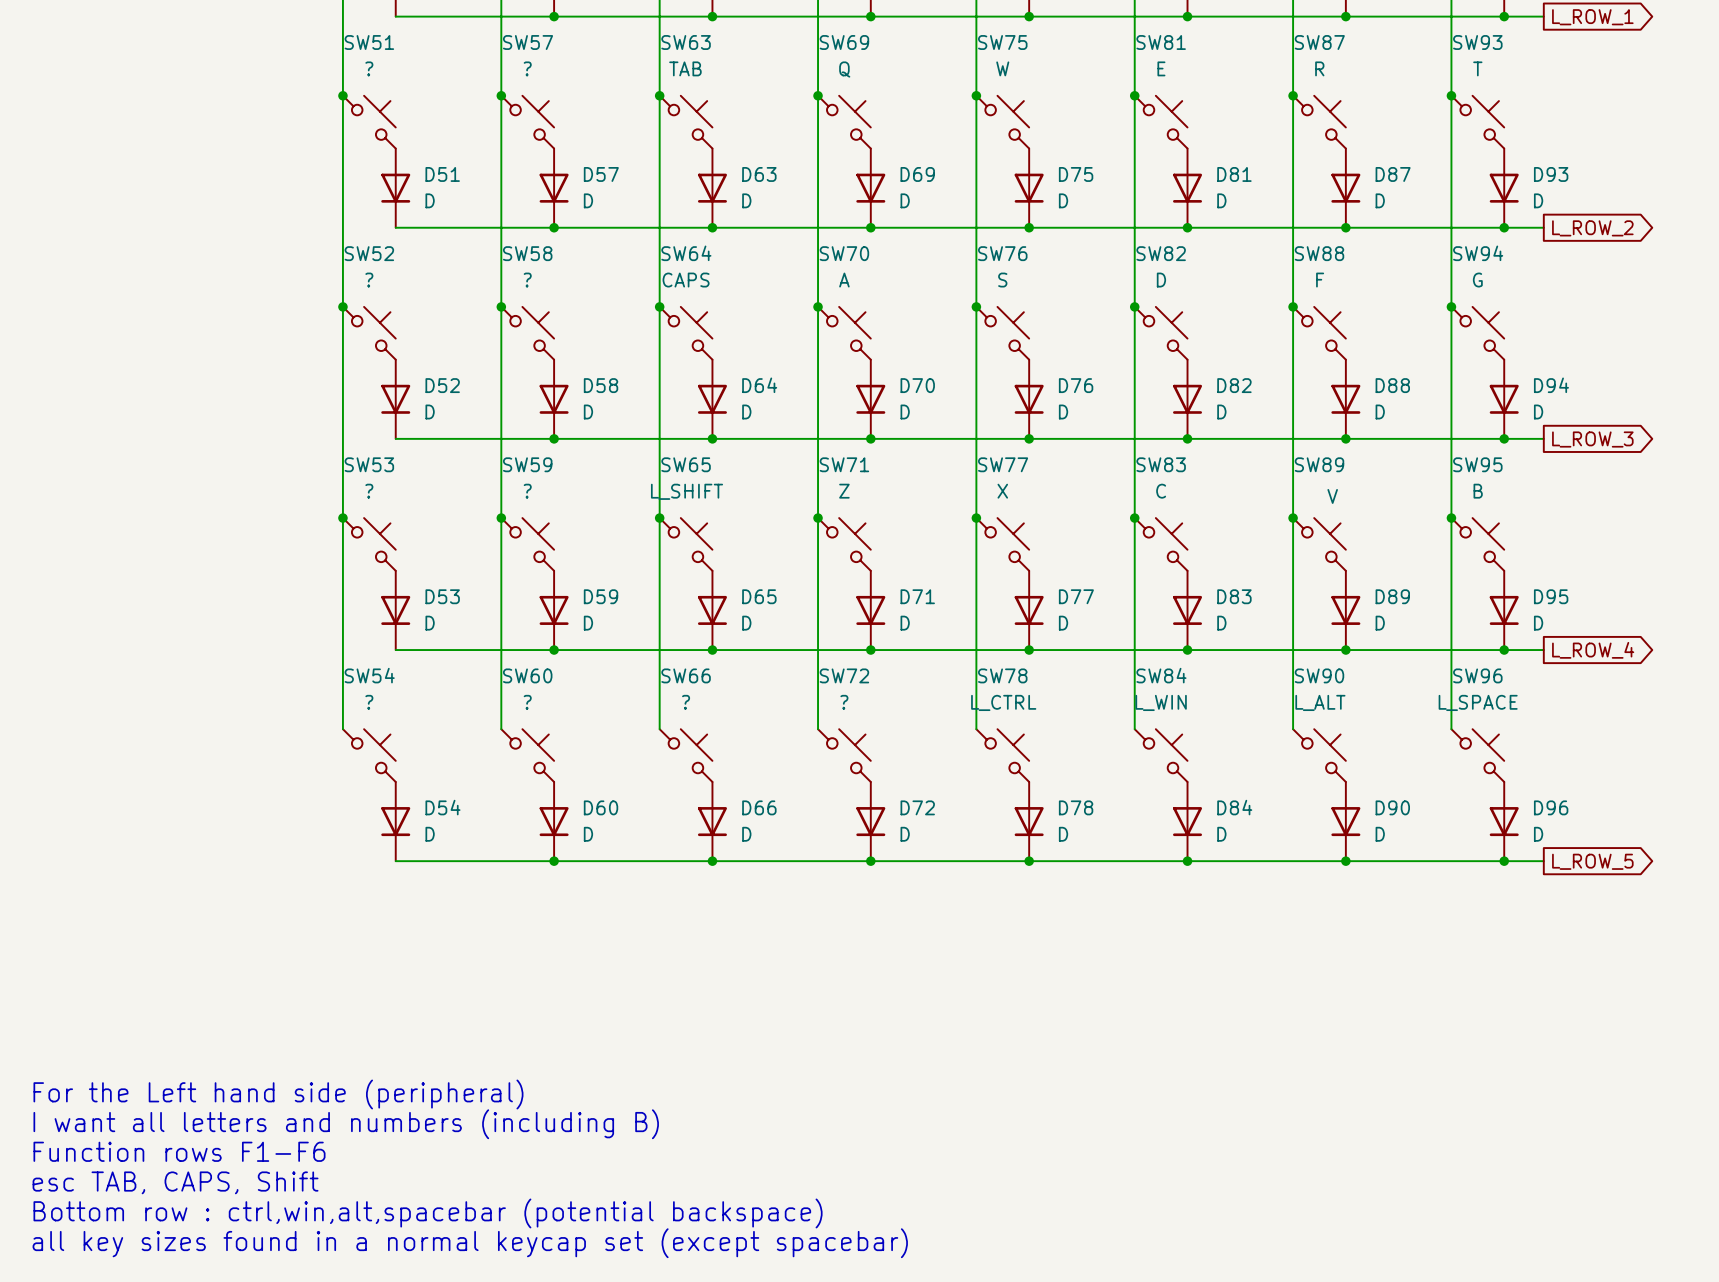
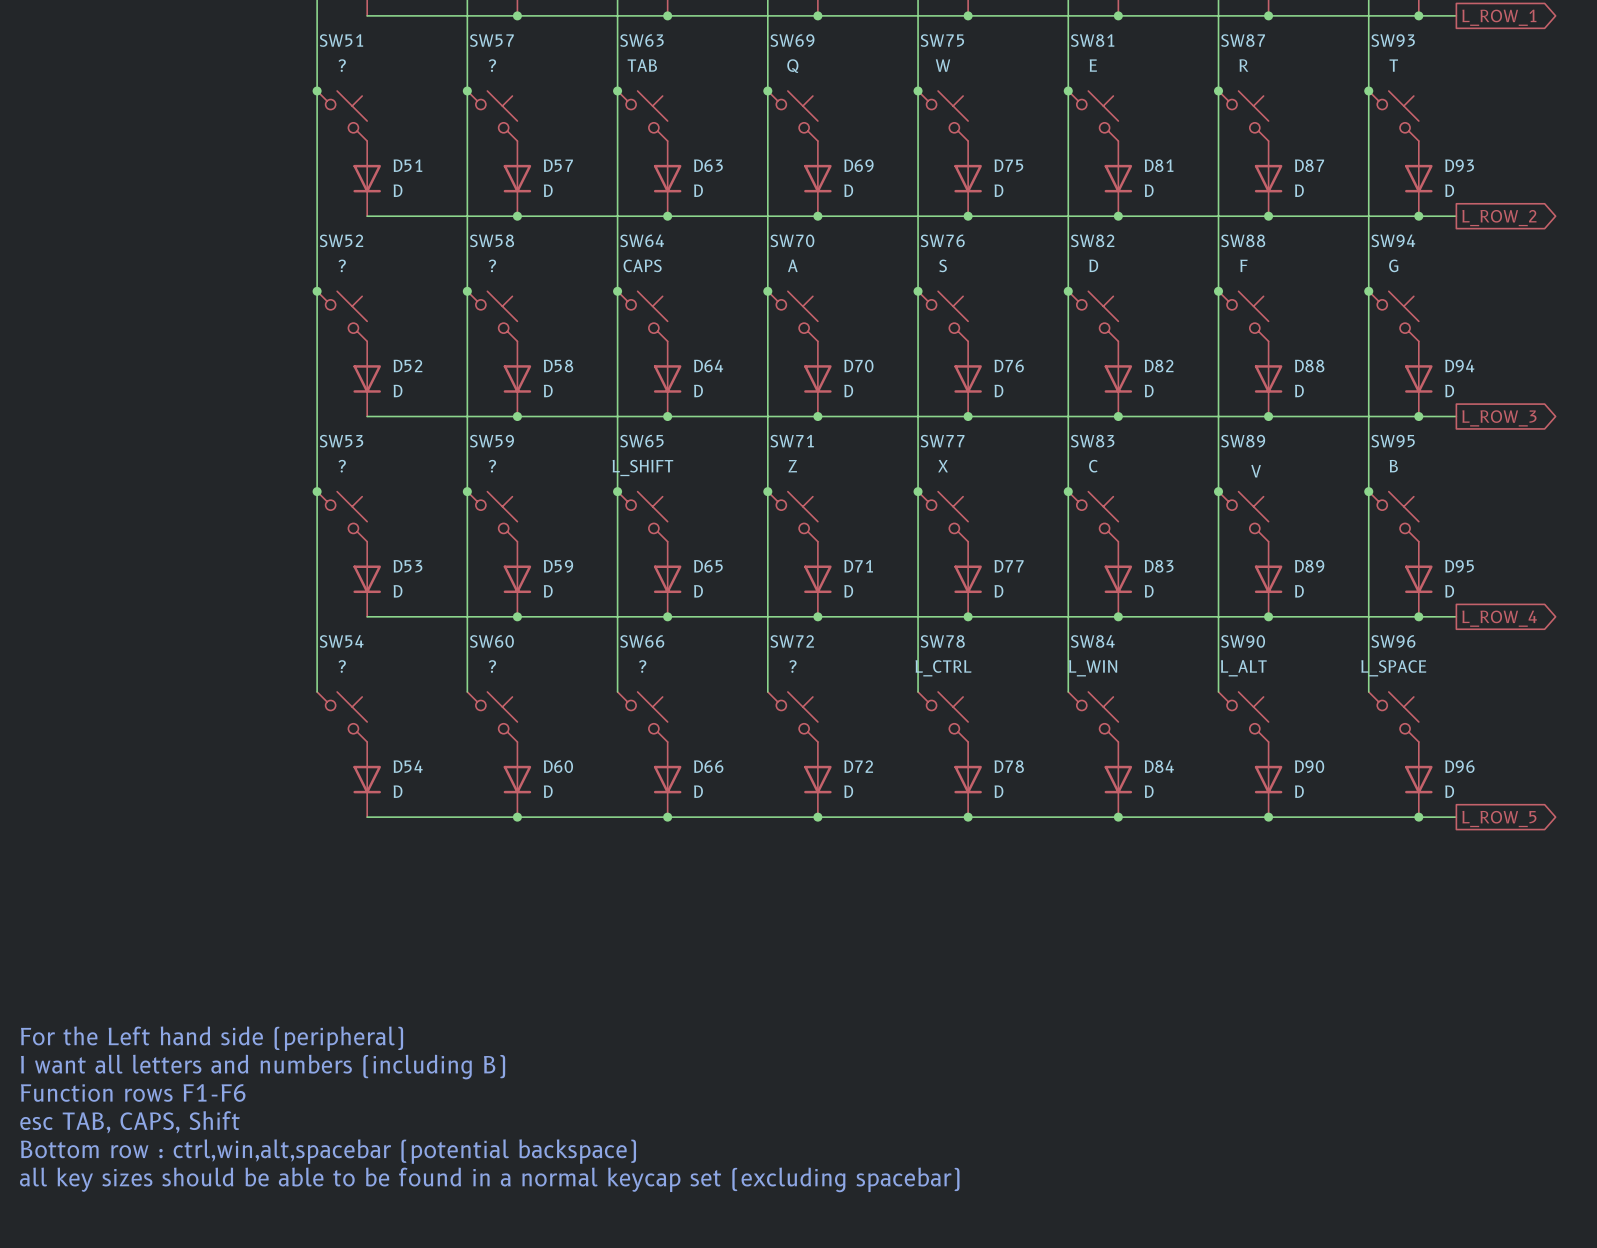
text: all key sizes found in a normal keycap set (except spacebar) (470, 1243) -> all key sizes should be able to be found in a normal keycap set (excluding spacebar) (489, 1179)

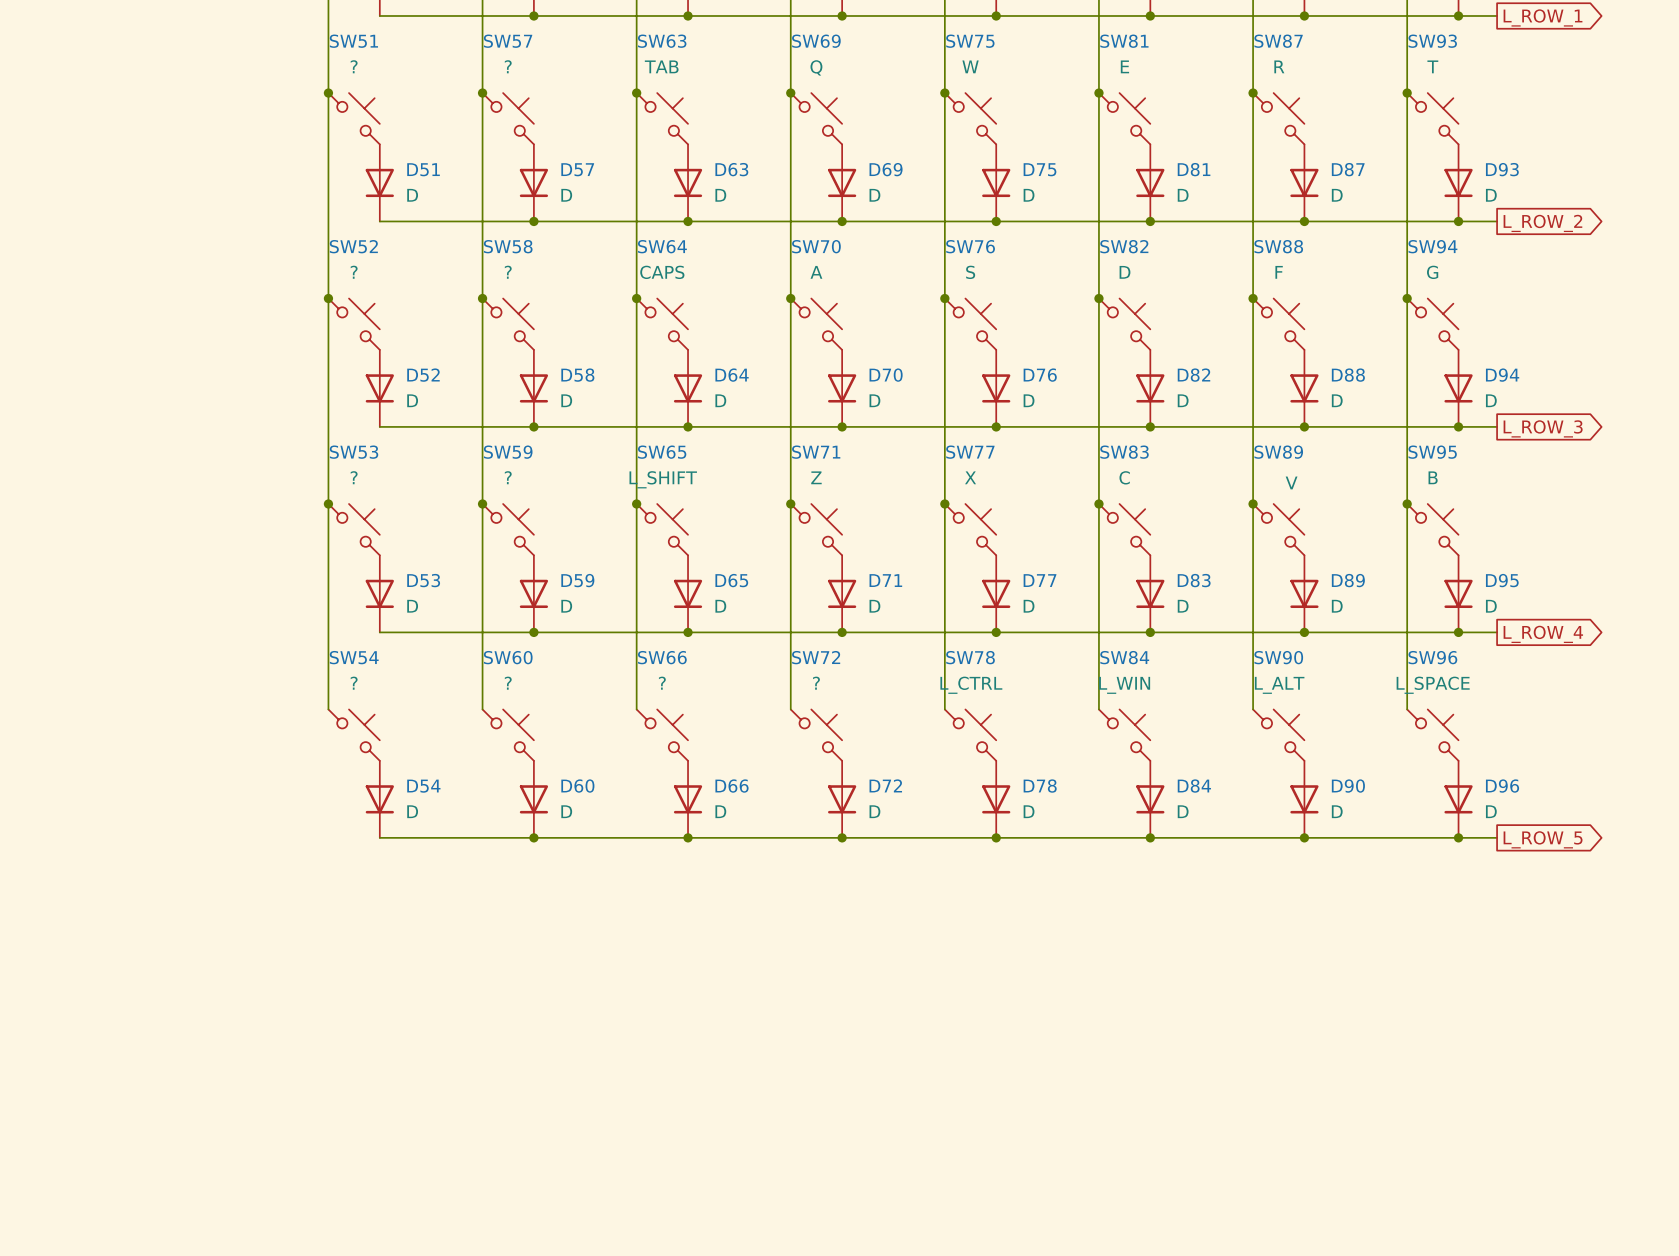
text: For the Left hand side (peripheral) (212, 1038) -> none
text: I want all letters and numbers (including B) (263, 1067) -> none
text: Function rows F1-F6 (133, 1092) -> none
text: esc TAB, CAPS, Shift (129, 1122) -> none
text: Bottom row : ctrl,win,alt,spacebar (potential backspace) (328, 1151) -> none
text: all key sizes should be able to be found in a normal keycap set (excluding spacebar) (489, 1179) -> none

